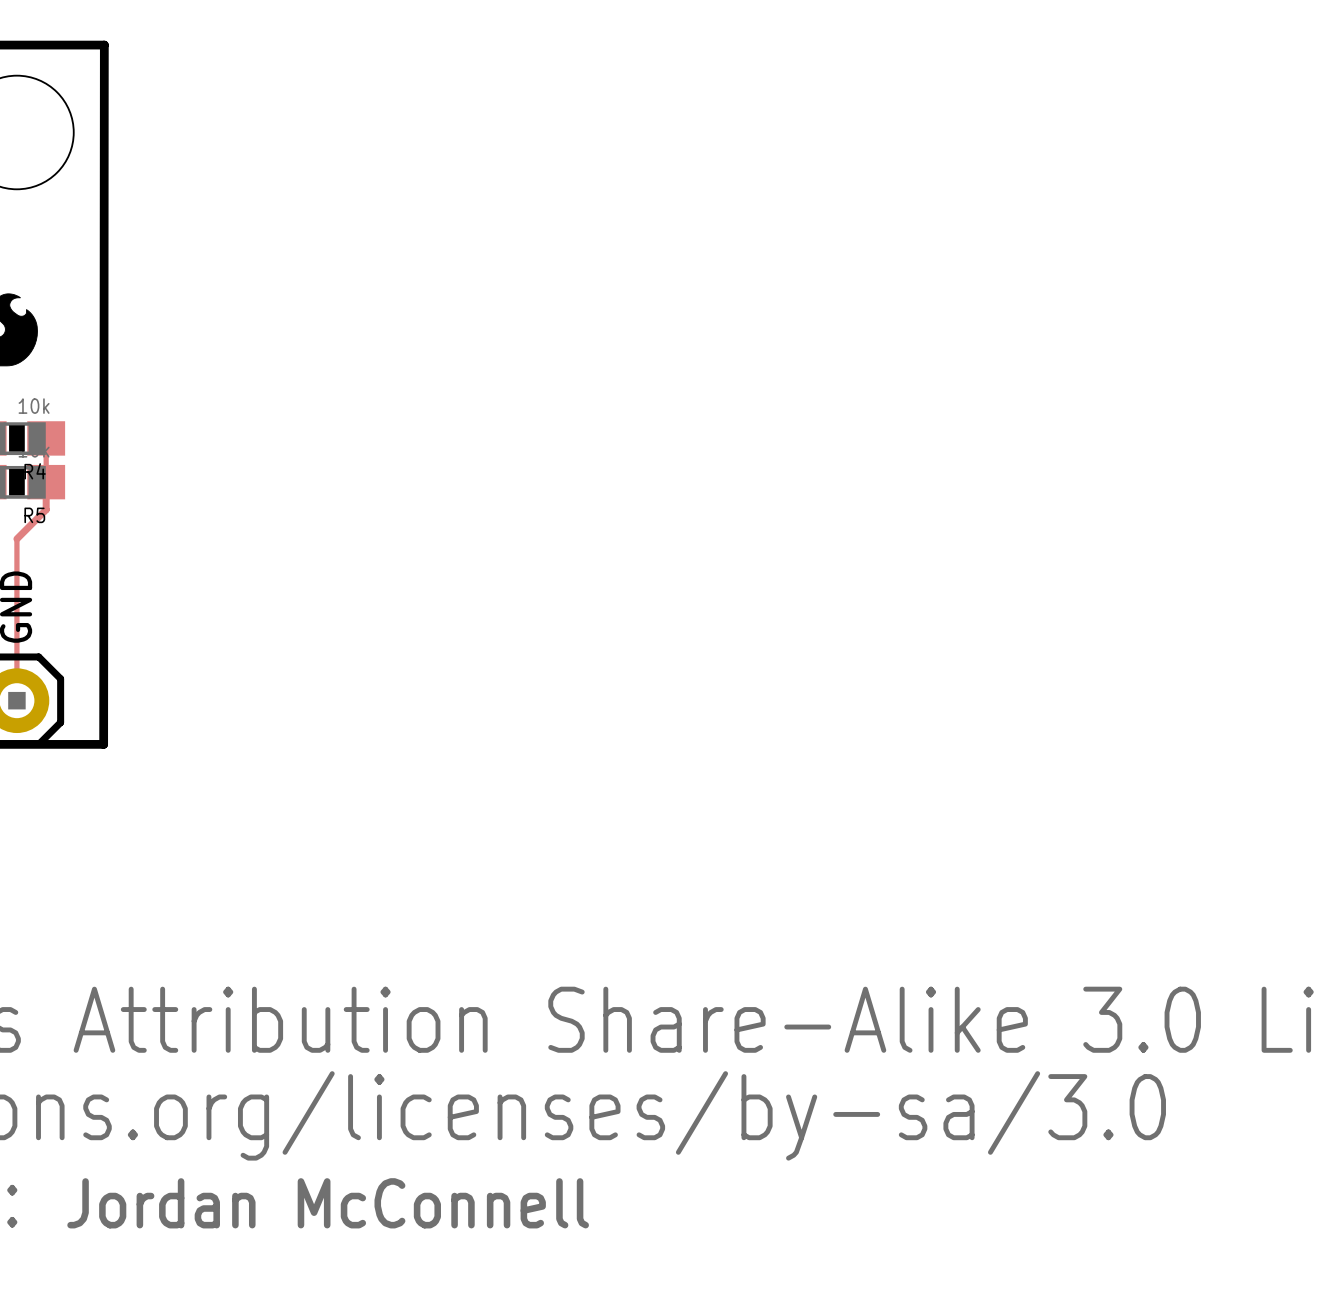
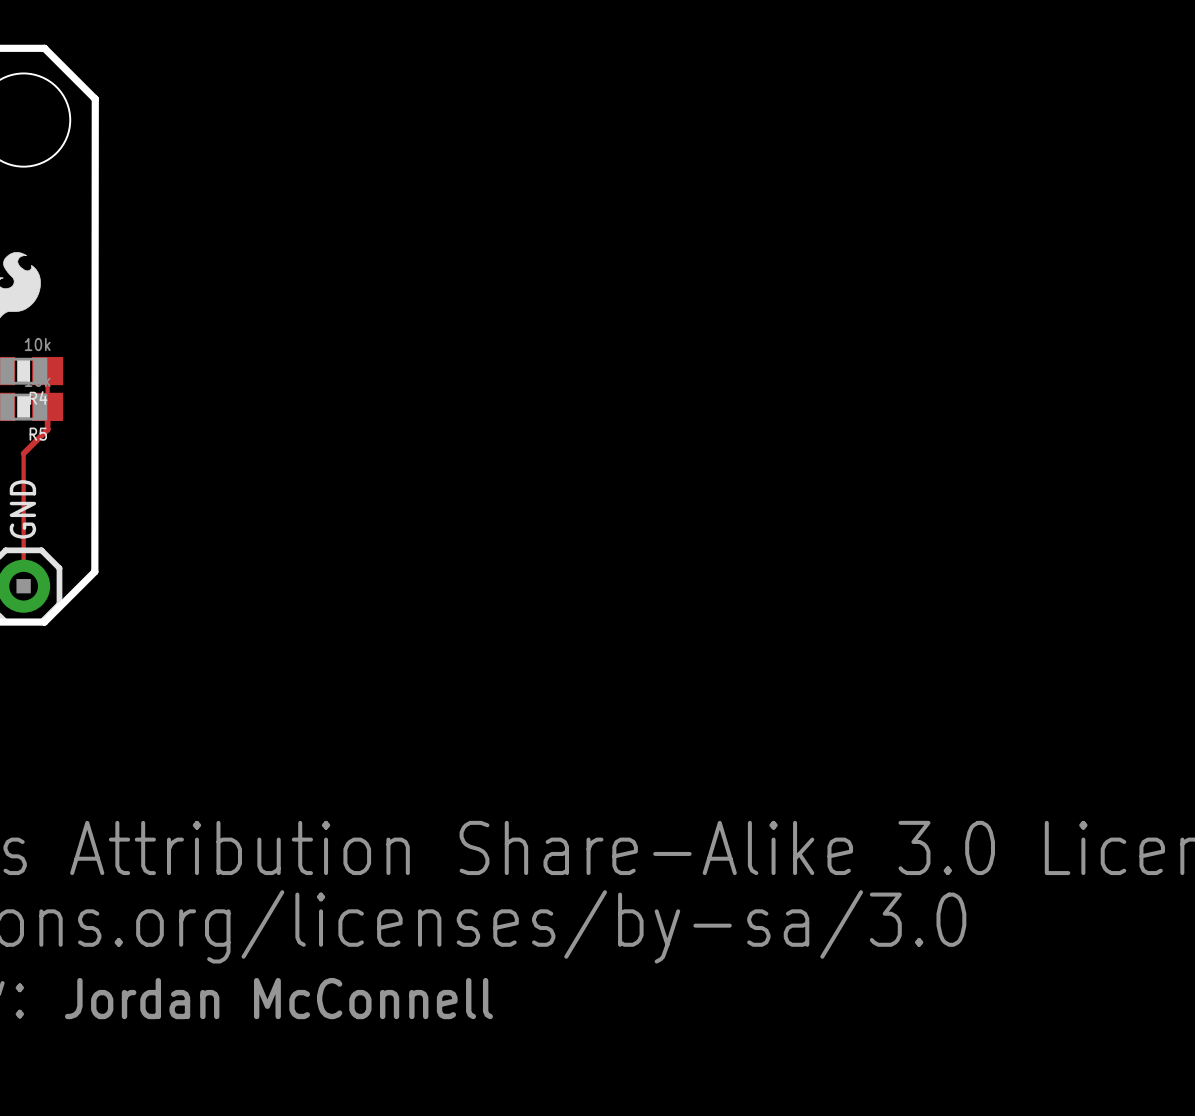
board edge: (42, 45) (104, 45) (104, 106) -> (44, 48) (95, 99)
board edge: (103, 683) (103, 744) (42, 744) -> (94, 571) (44, 622)

